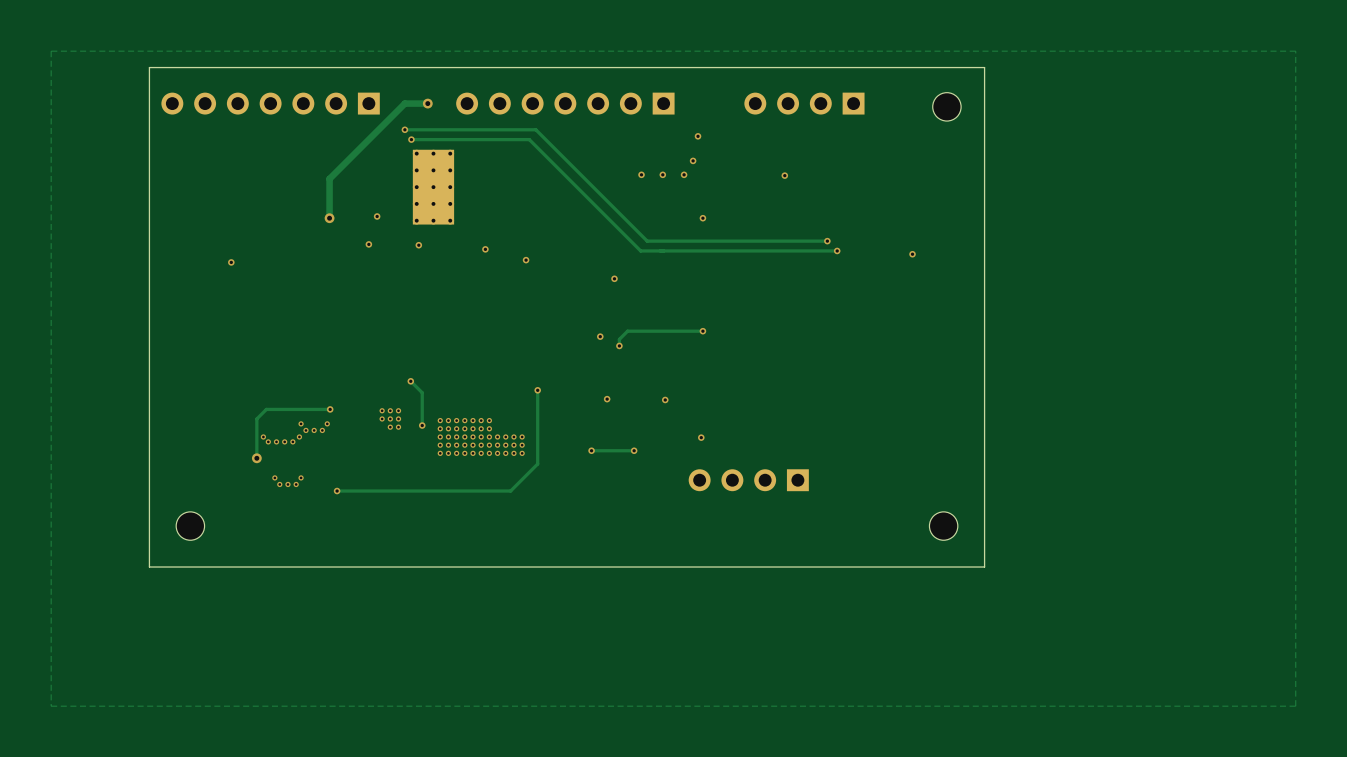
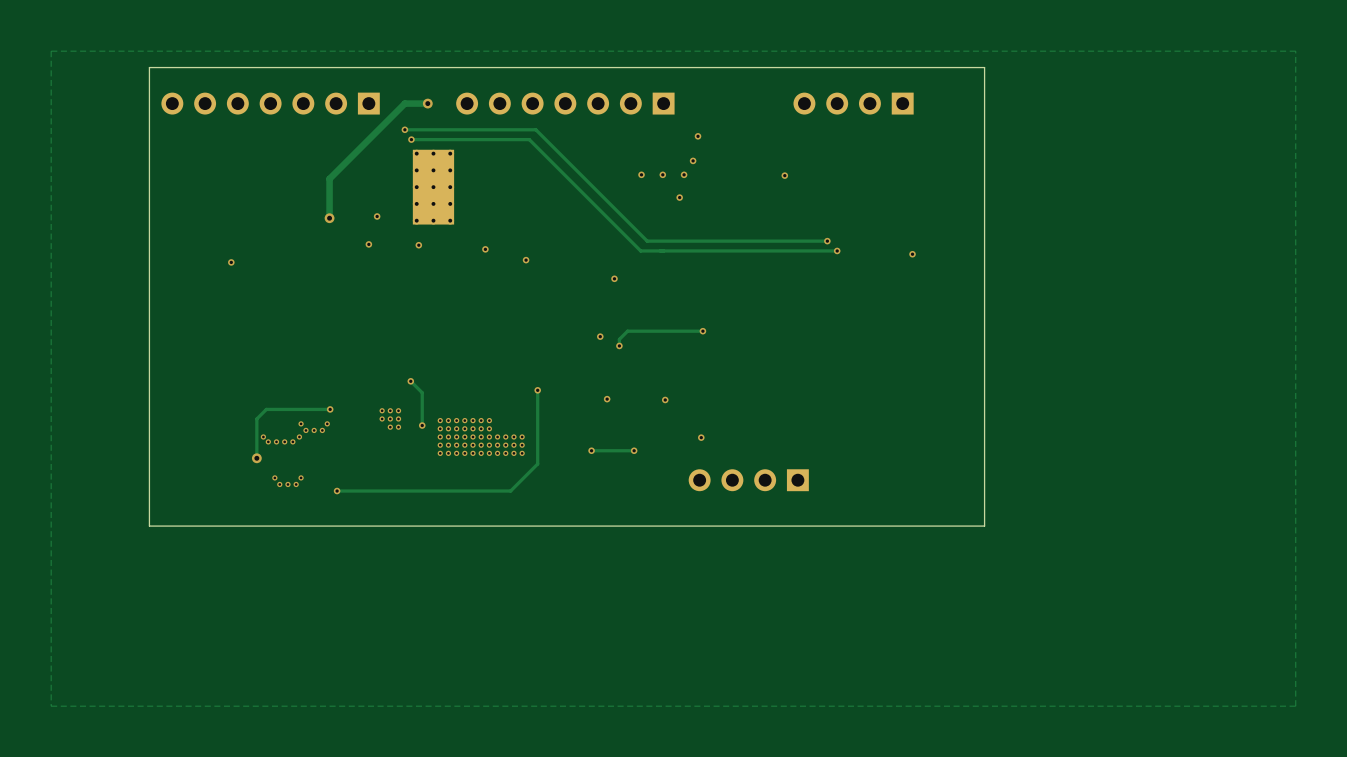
part position: (804, 103) -> (853, 103)
part: (946, 106) -> none
via position: (702, 218) -> (679, 197)
part: (190, 526) -> none
part: (943, 526) -> none
board edge: (984, 526) (984, 567) (149, 567) (149, 526) -> (984, 526) (149, 526)

